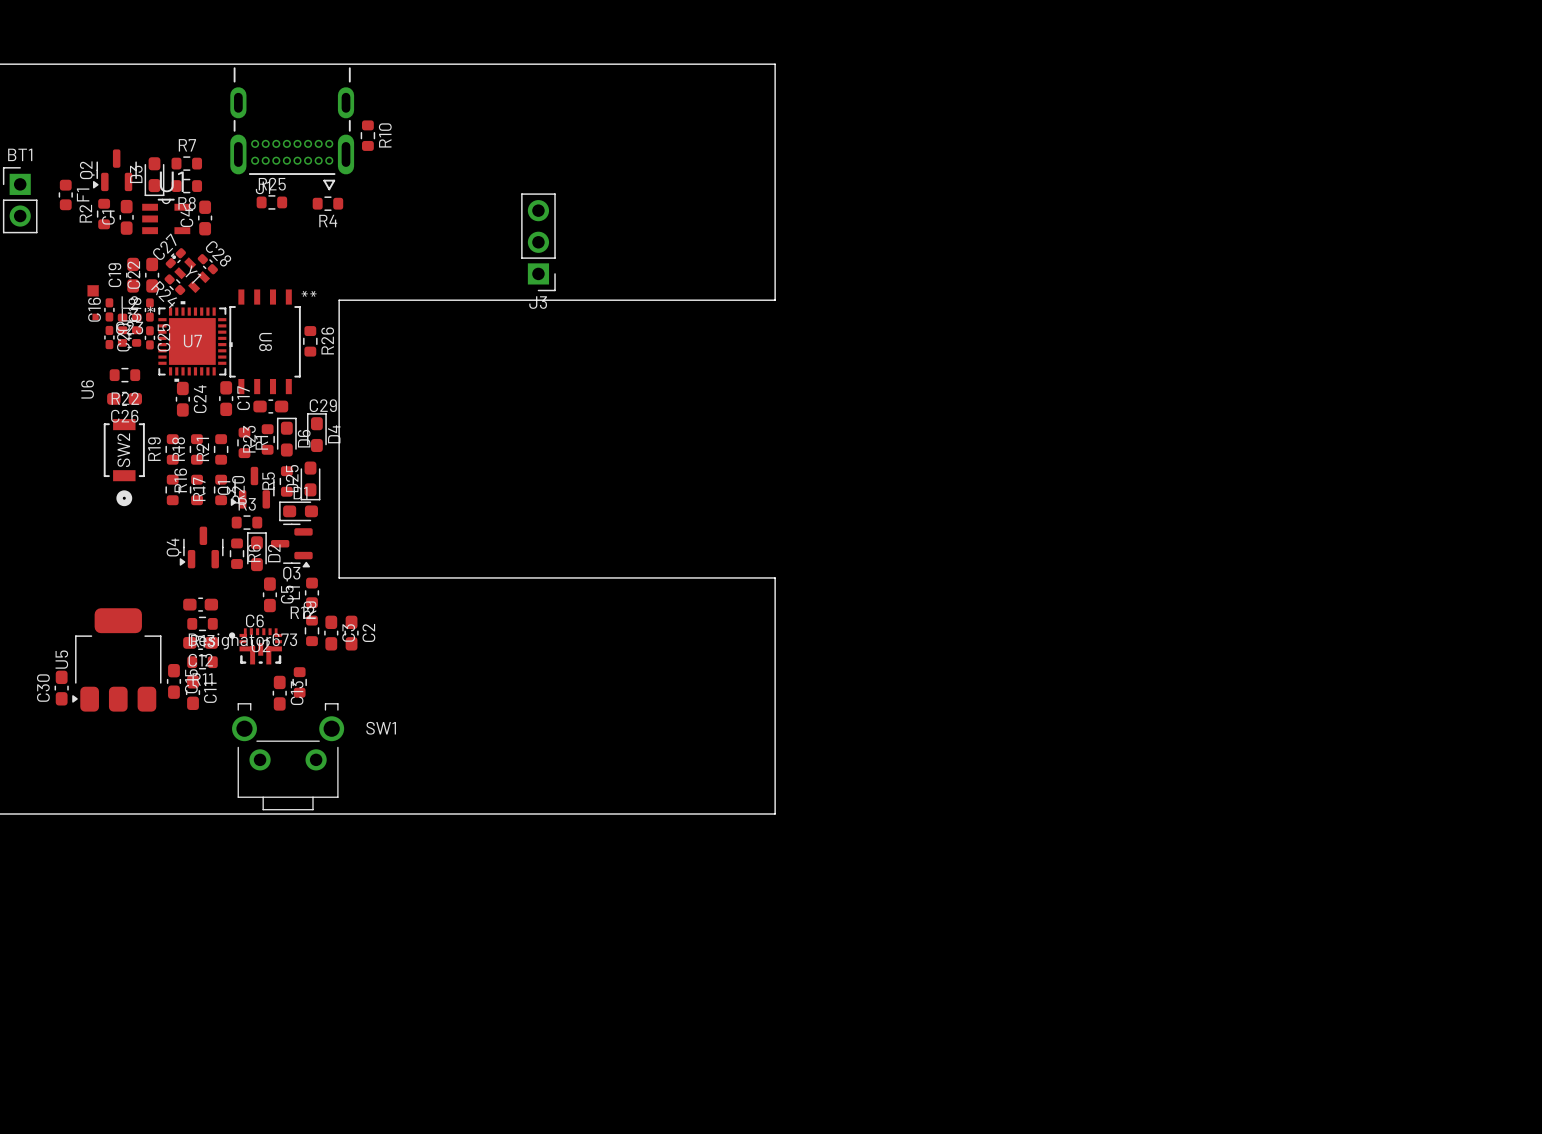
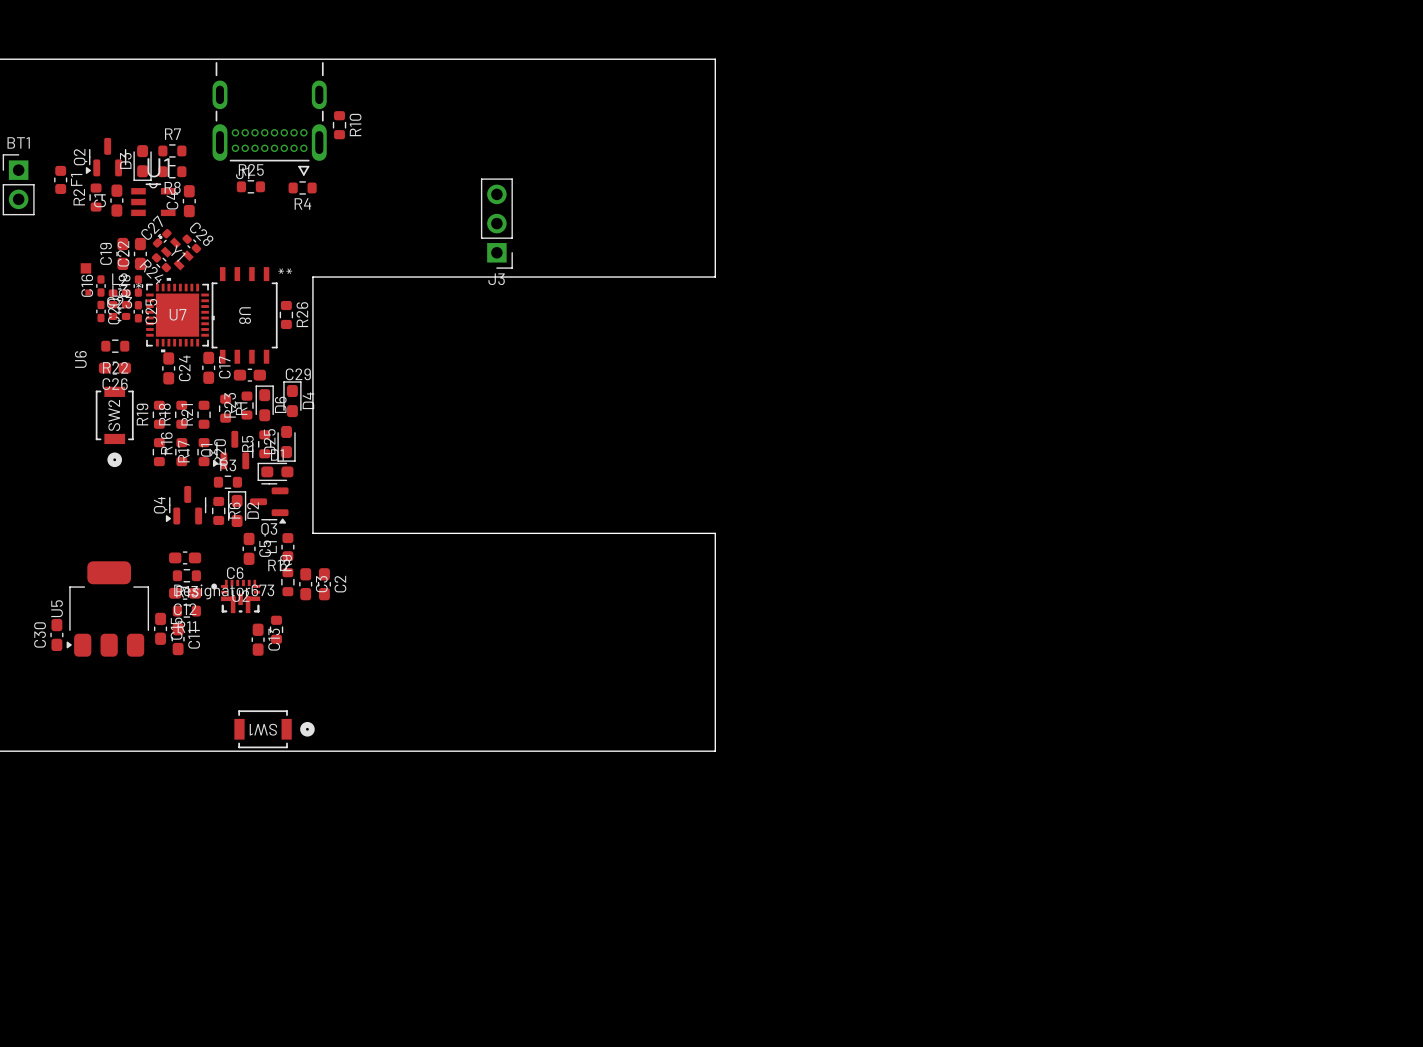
SW1 footprint: [232, 703, 345, 811] -> [234, 710, 315, 749]
SW1 name position: SW1 (381, 728) -> SW1 (263, 729)

